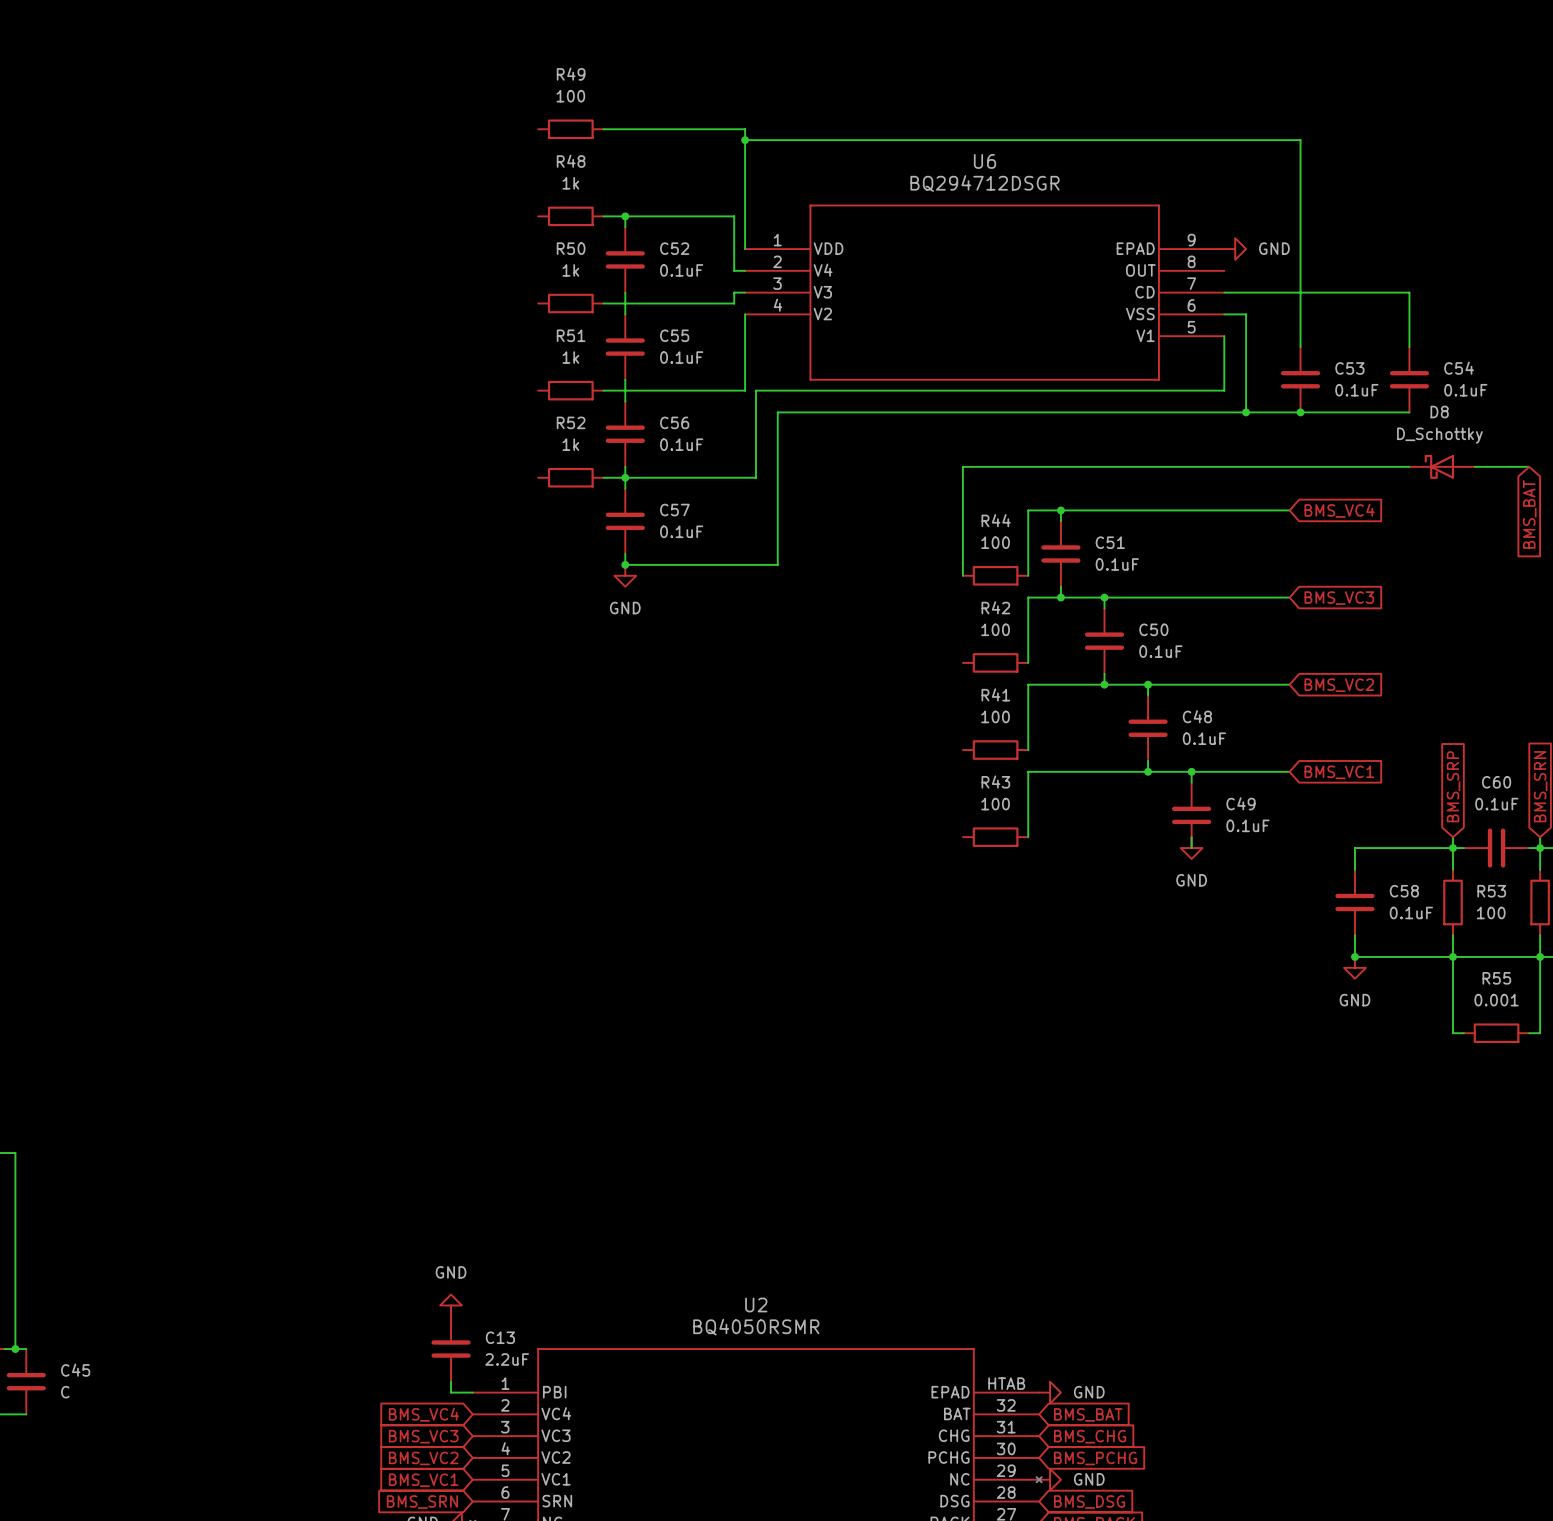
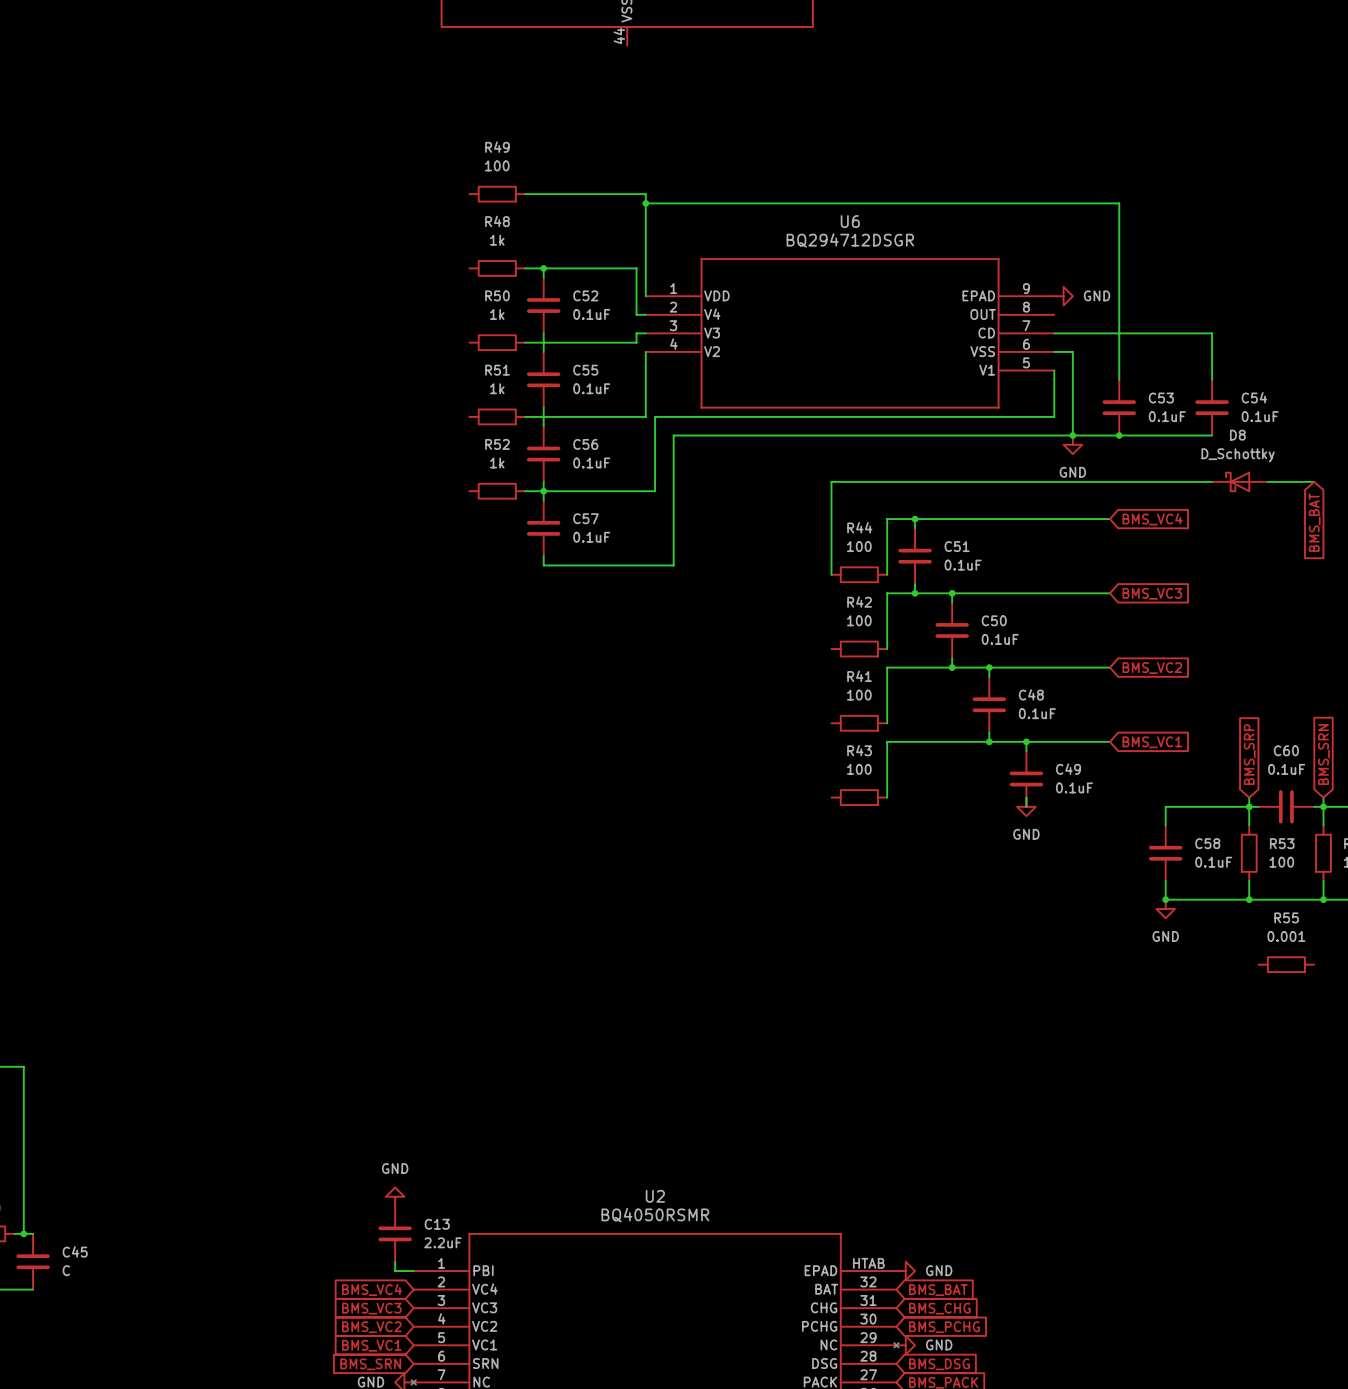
power symbol: none -> GND (1072, 444)
junction: (625, 564) -> none
power symbol: GND (625, 575) -> none
wire: (1453, 956) (1453, 1033) (1463, 1033) -> none
wire: (1540, 956) (1540, 1033) (1529, 1033) -> none

